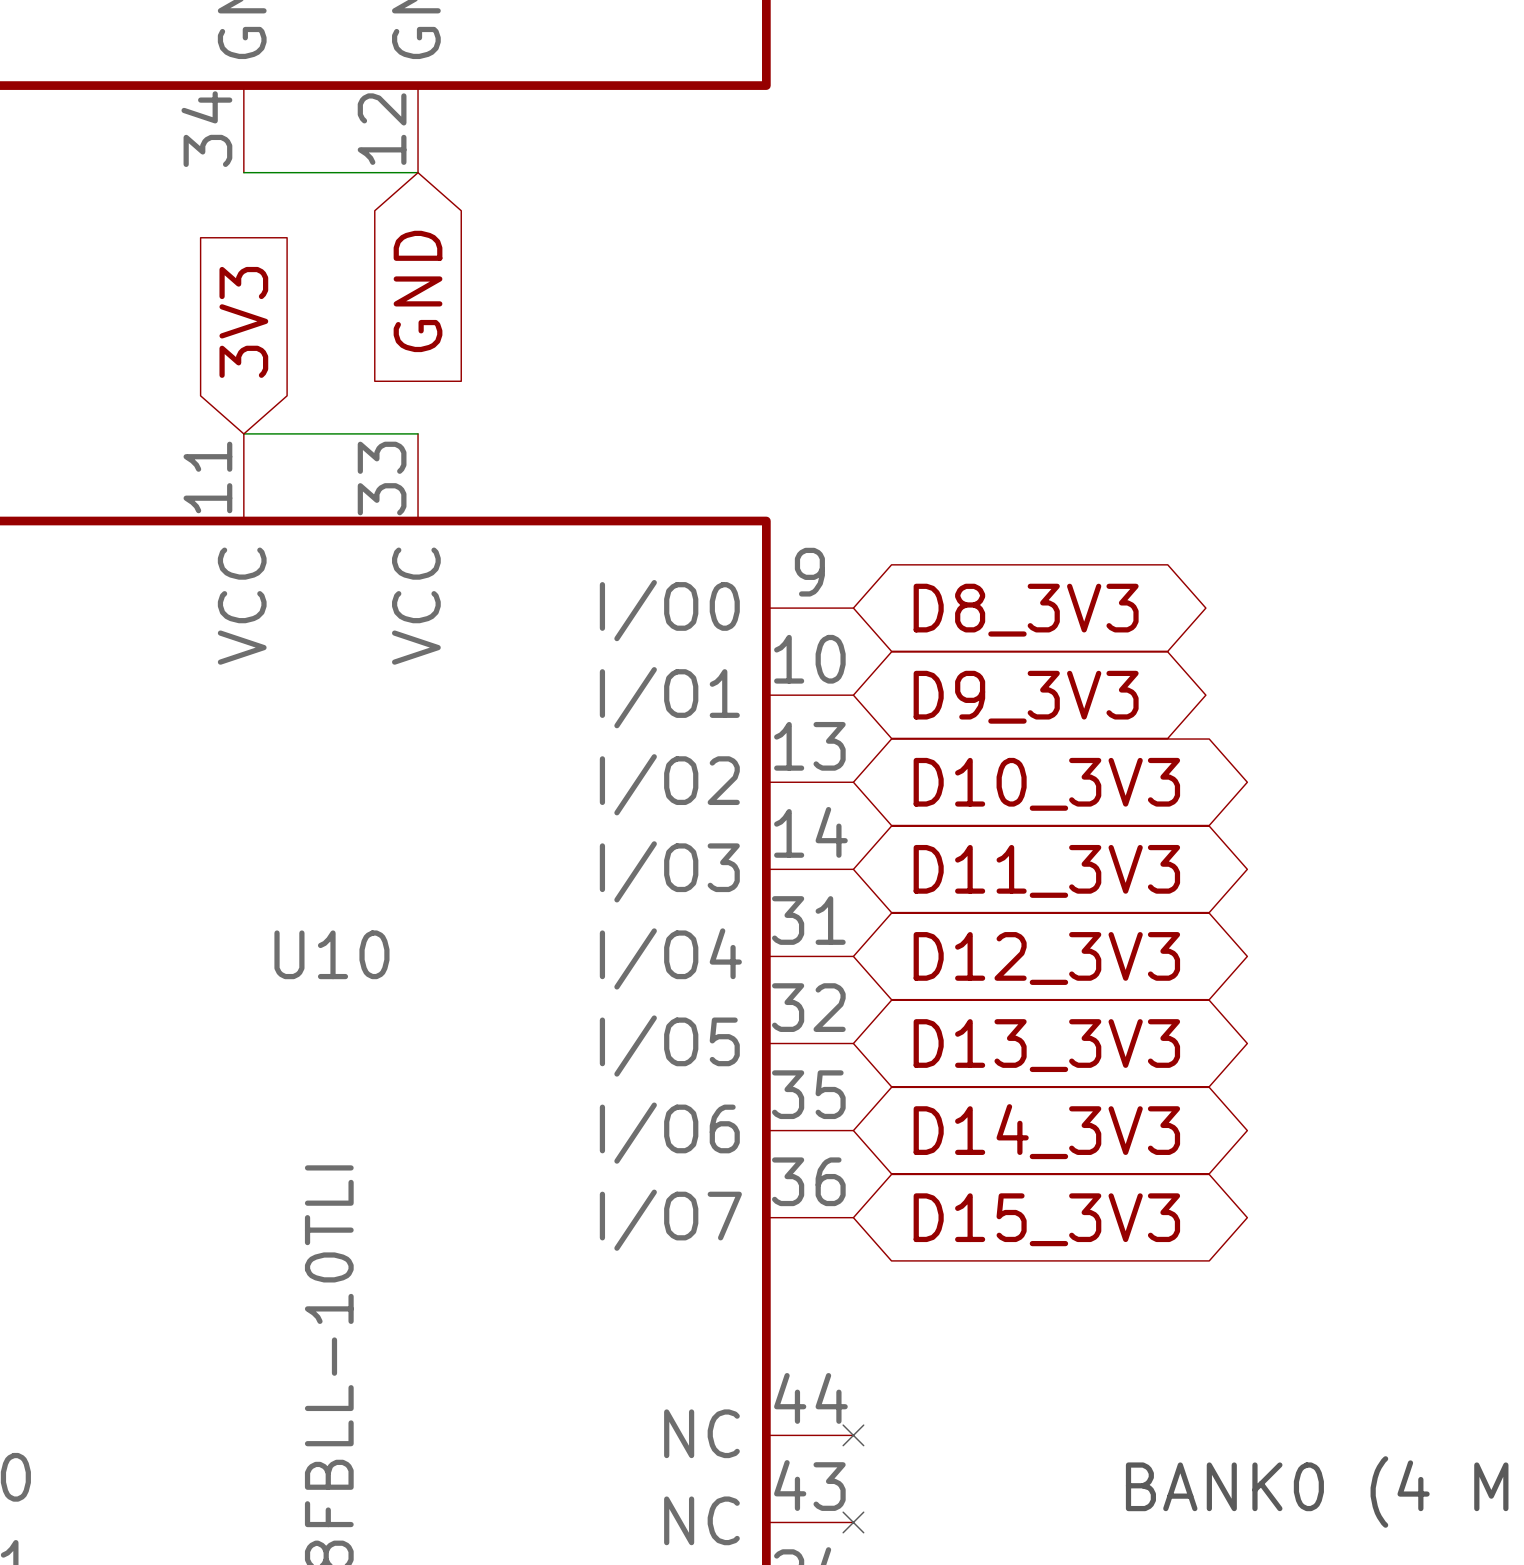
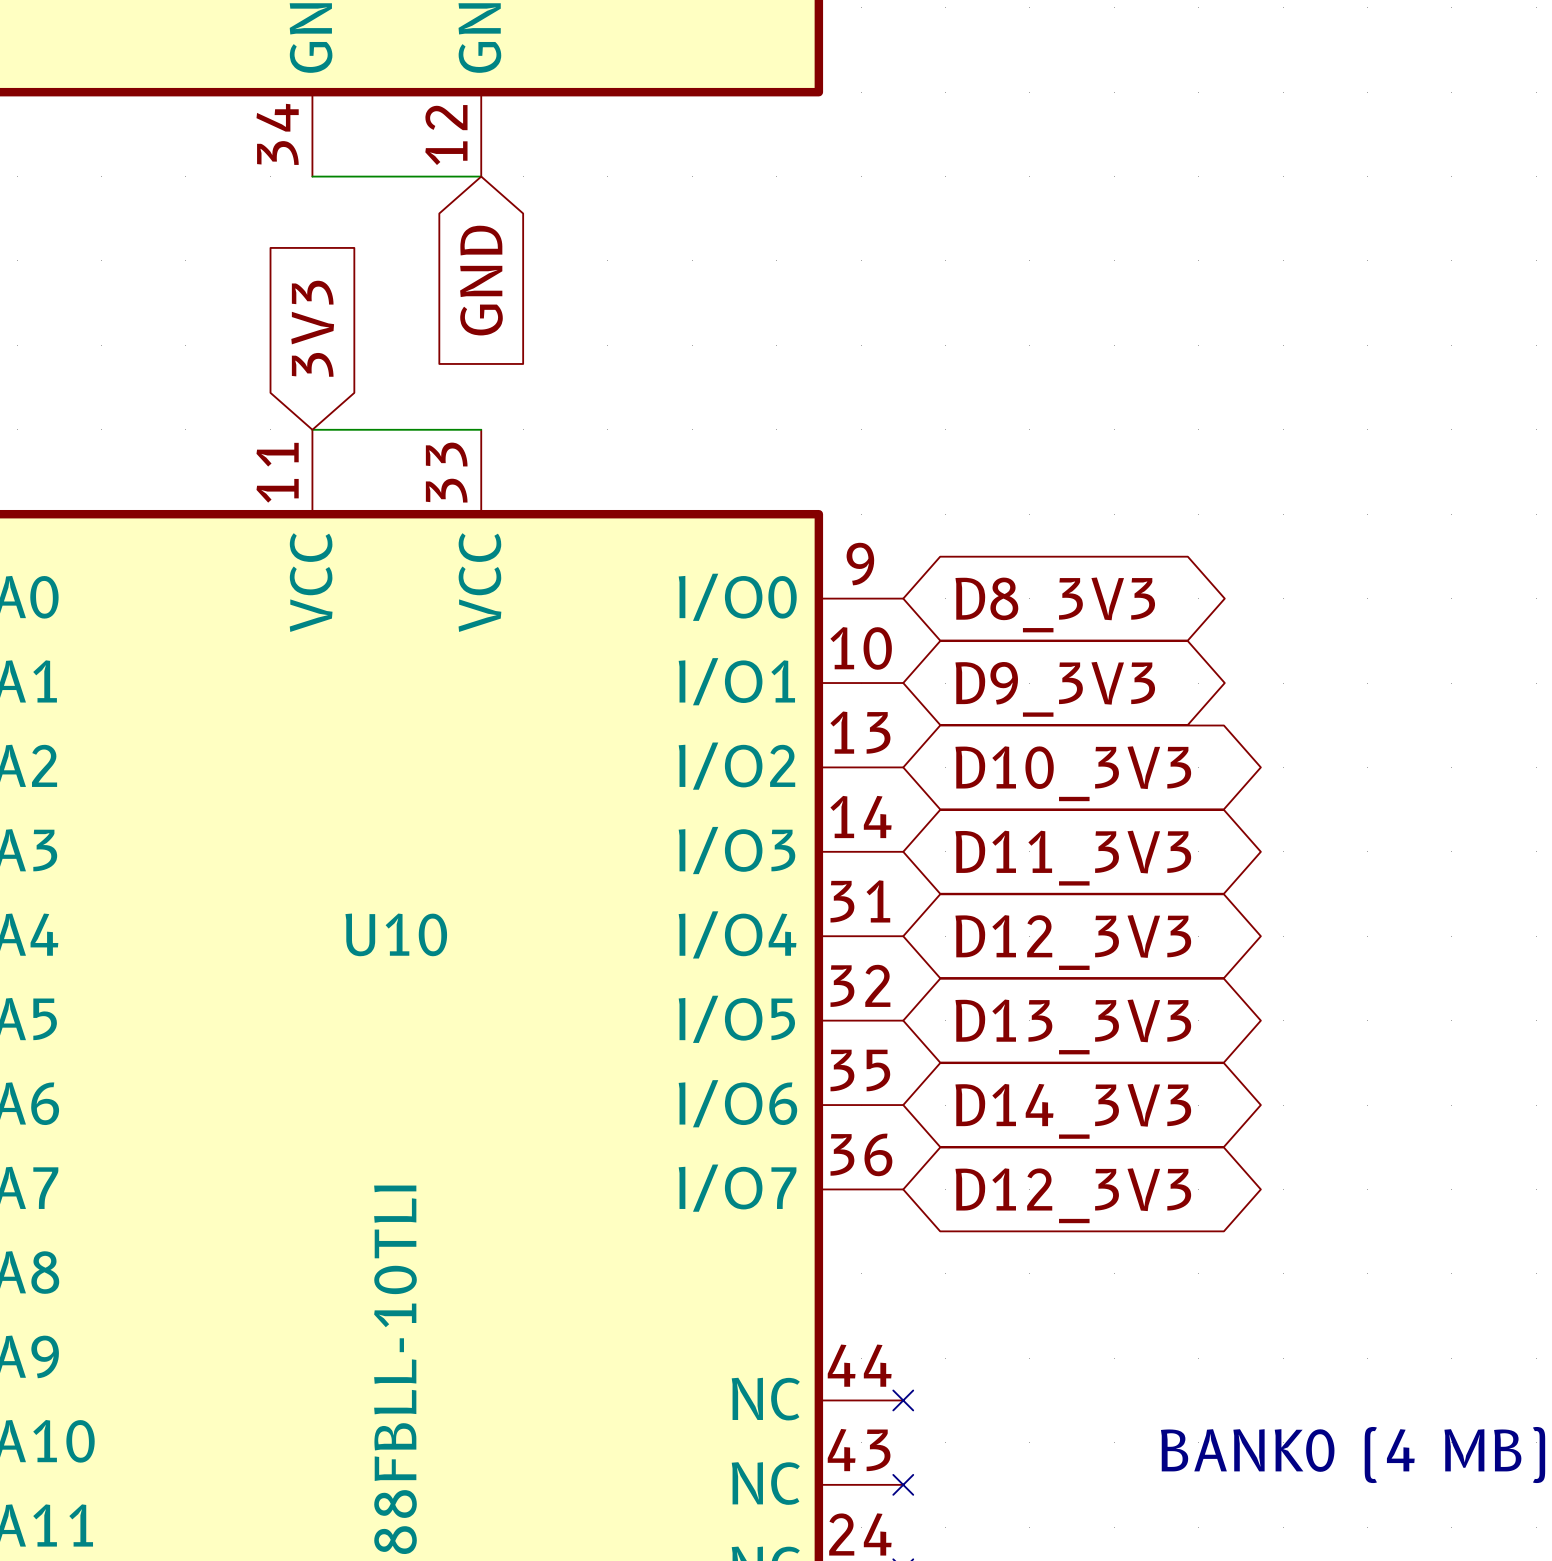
global label: D15_3V3 (1046, 1219) -> D12_3V3 (1073, 1195)

